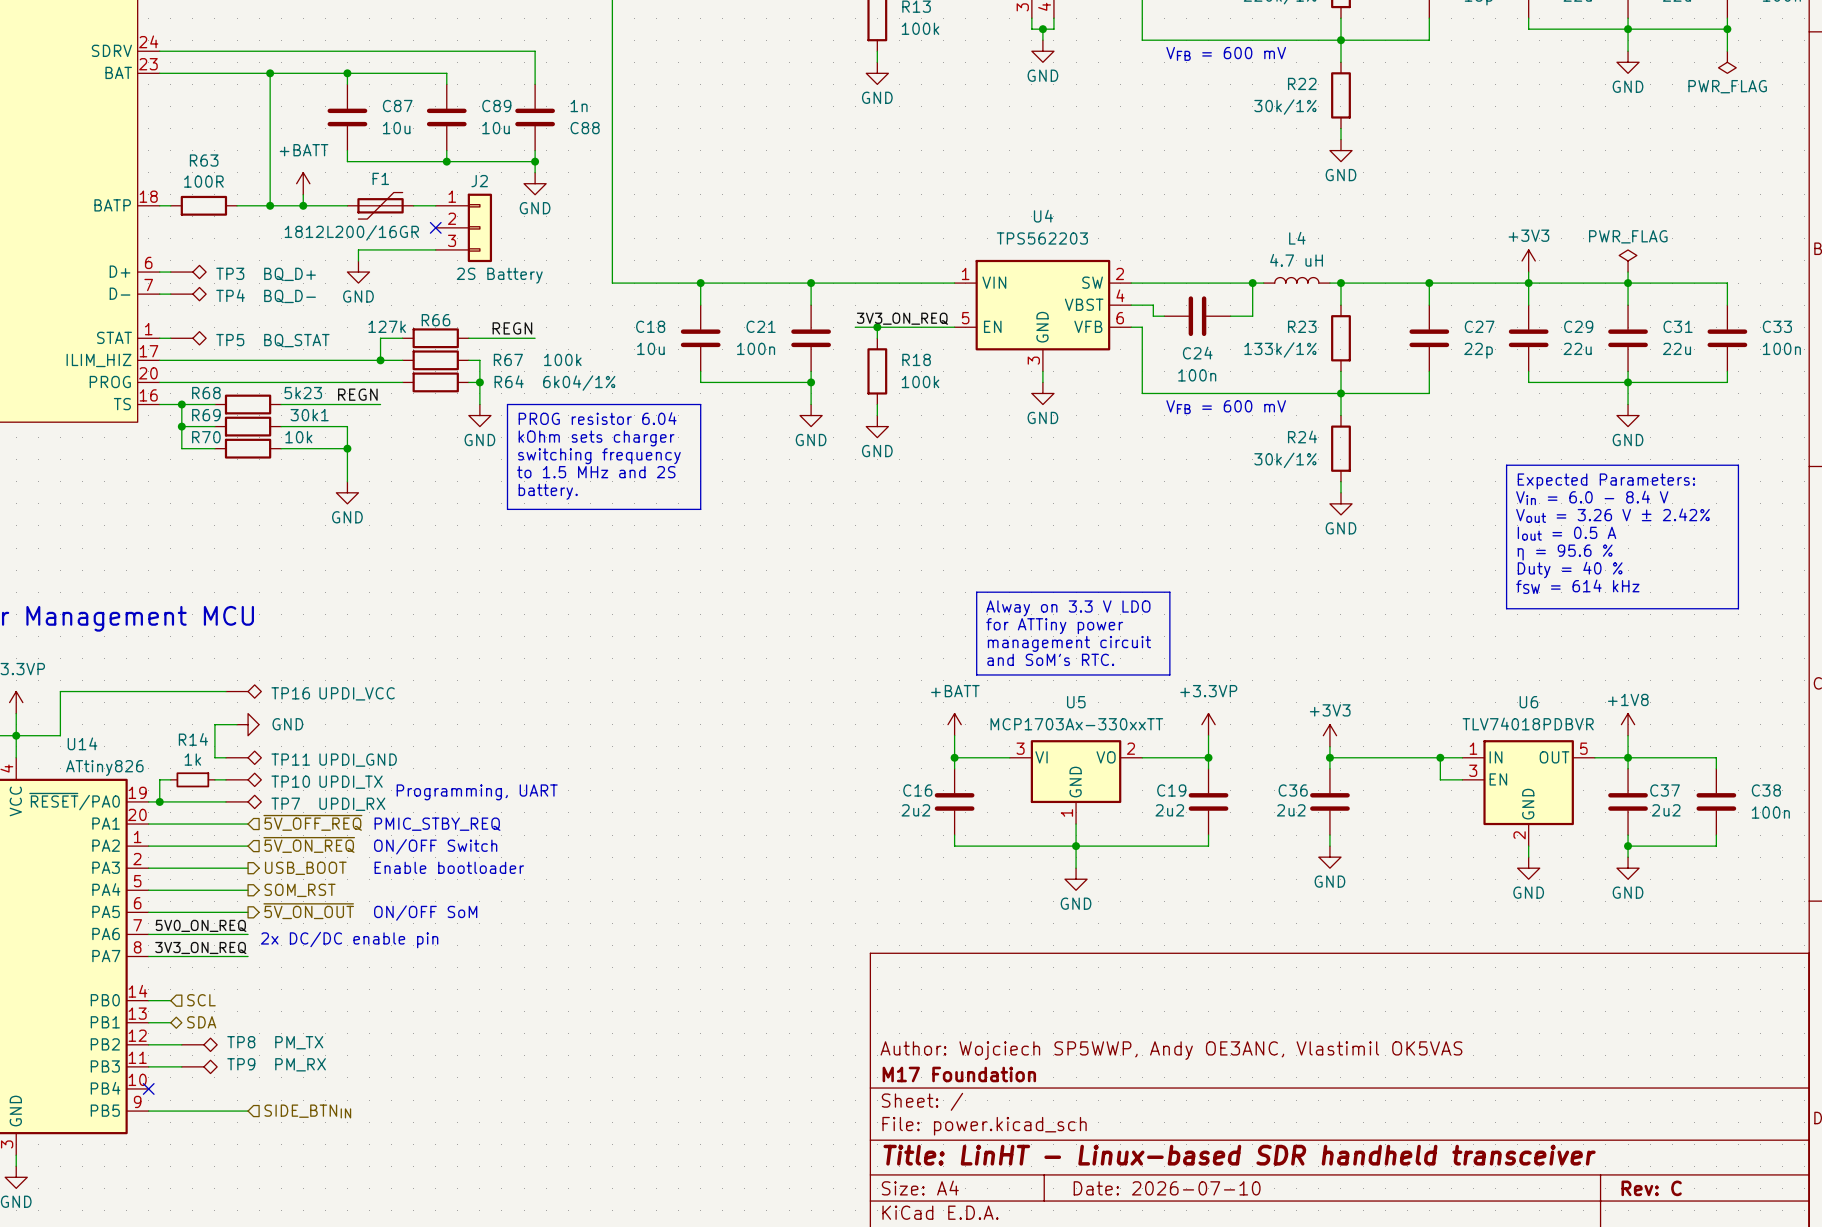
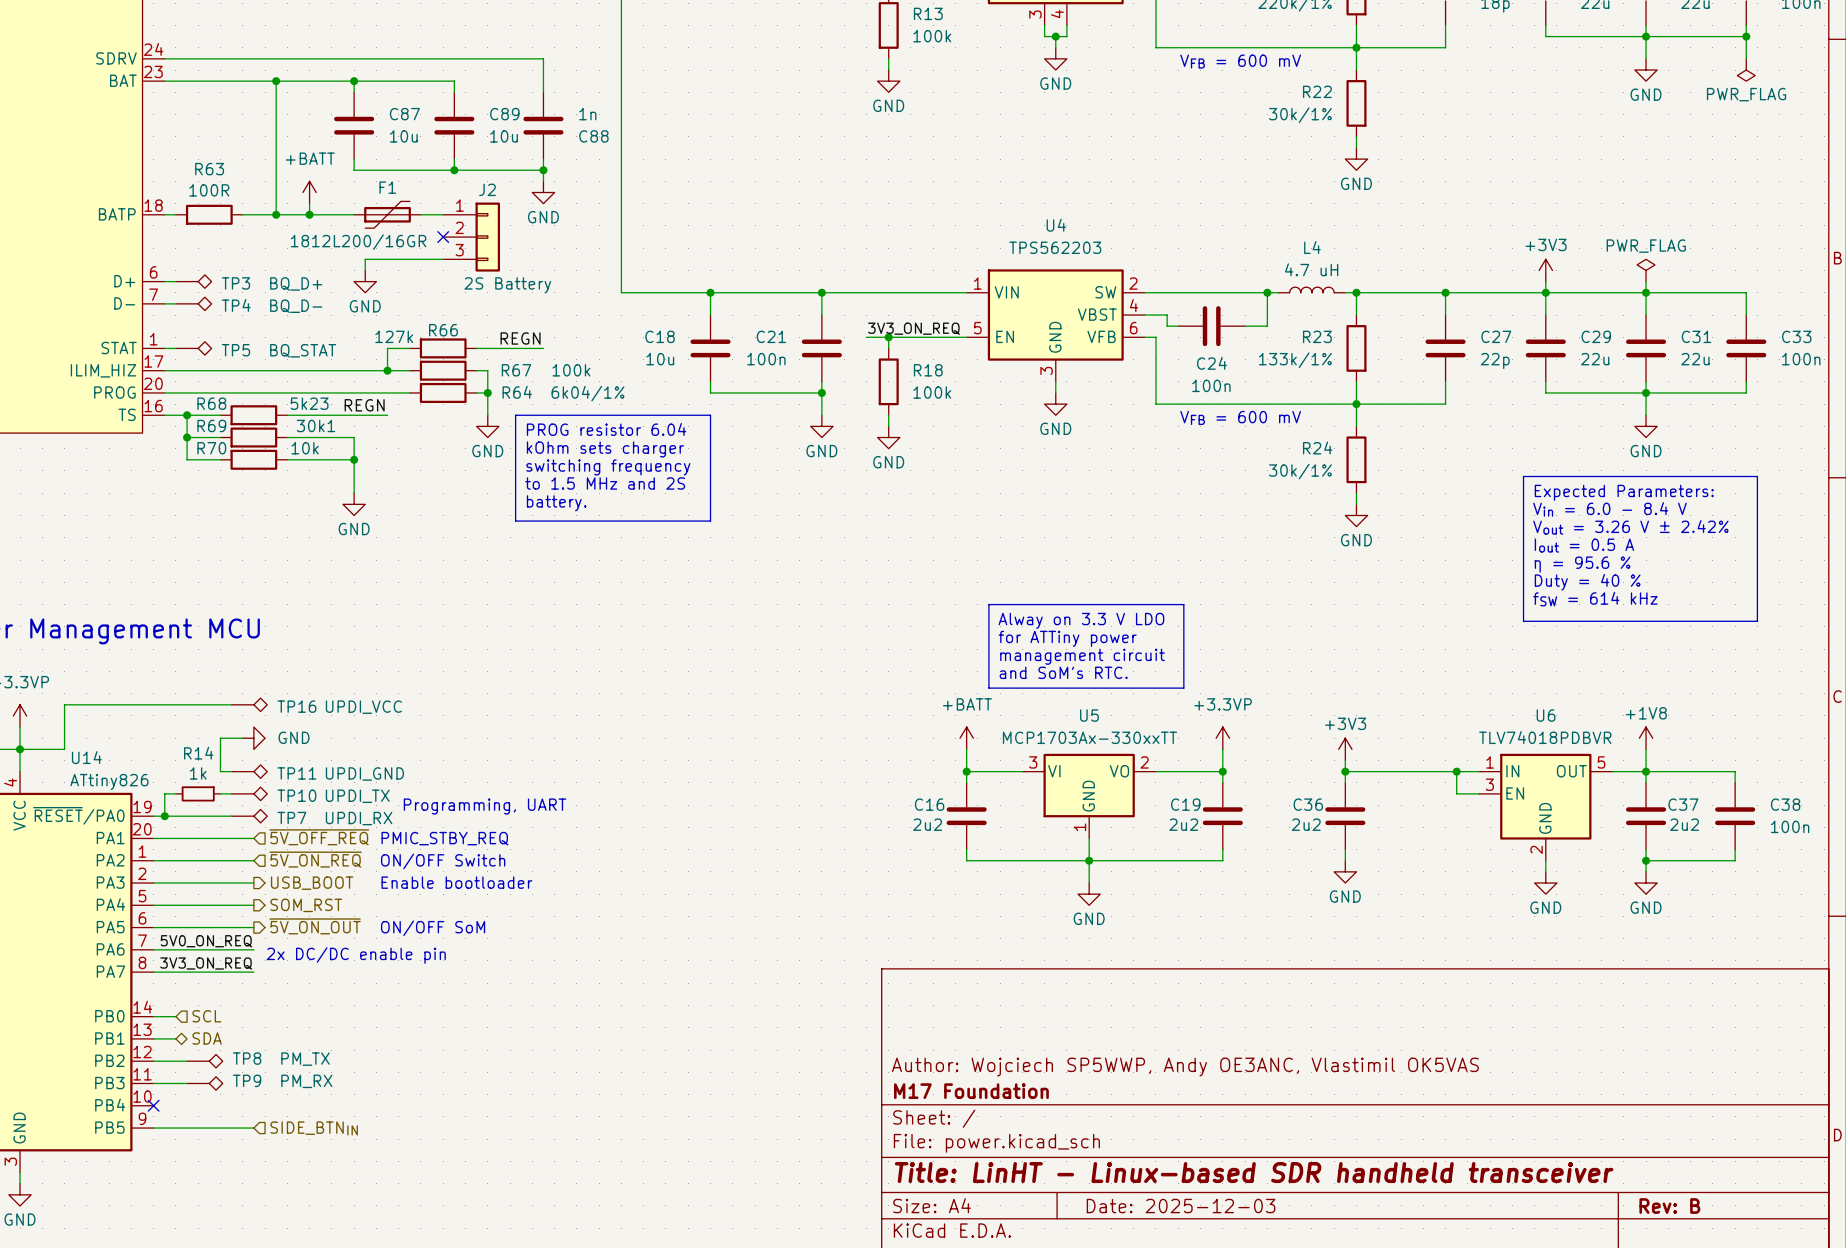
title block: Date: 2026-07-10 (1167, 1188) -> Date: 2025-12-03 (1181, 1206)
title block: Rev: C (1651, 1188) -> Rev: B (1669, 1206)

